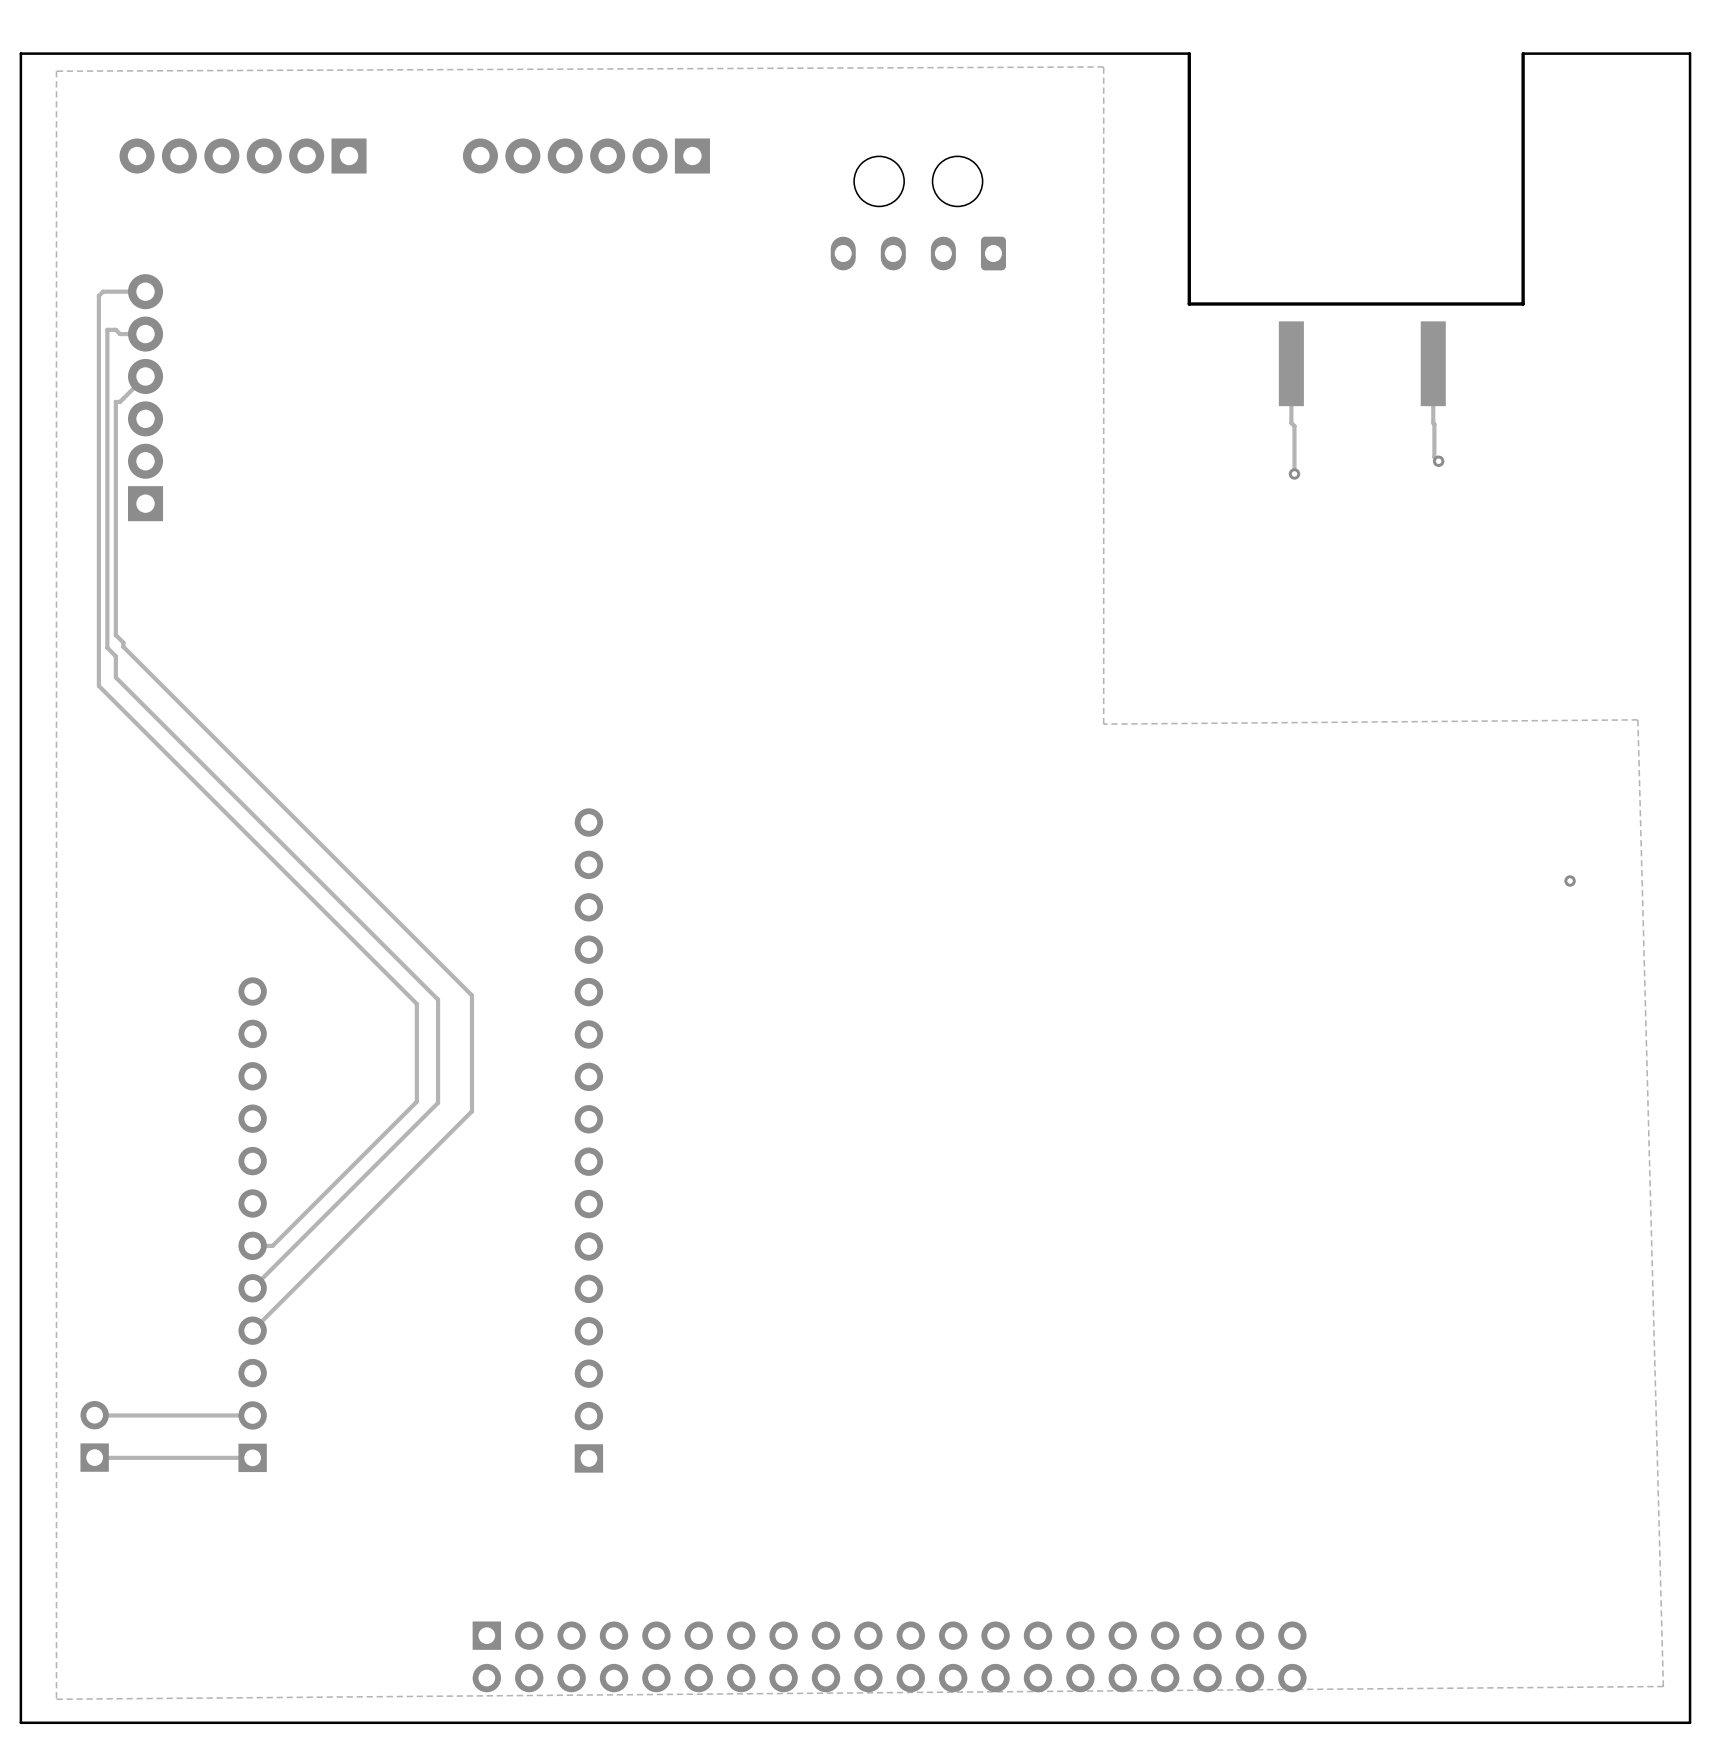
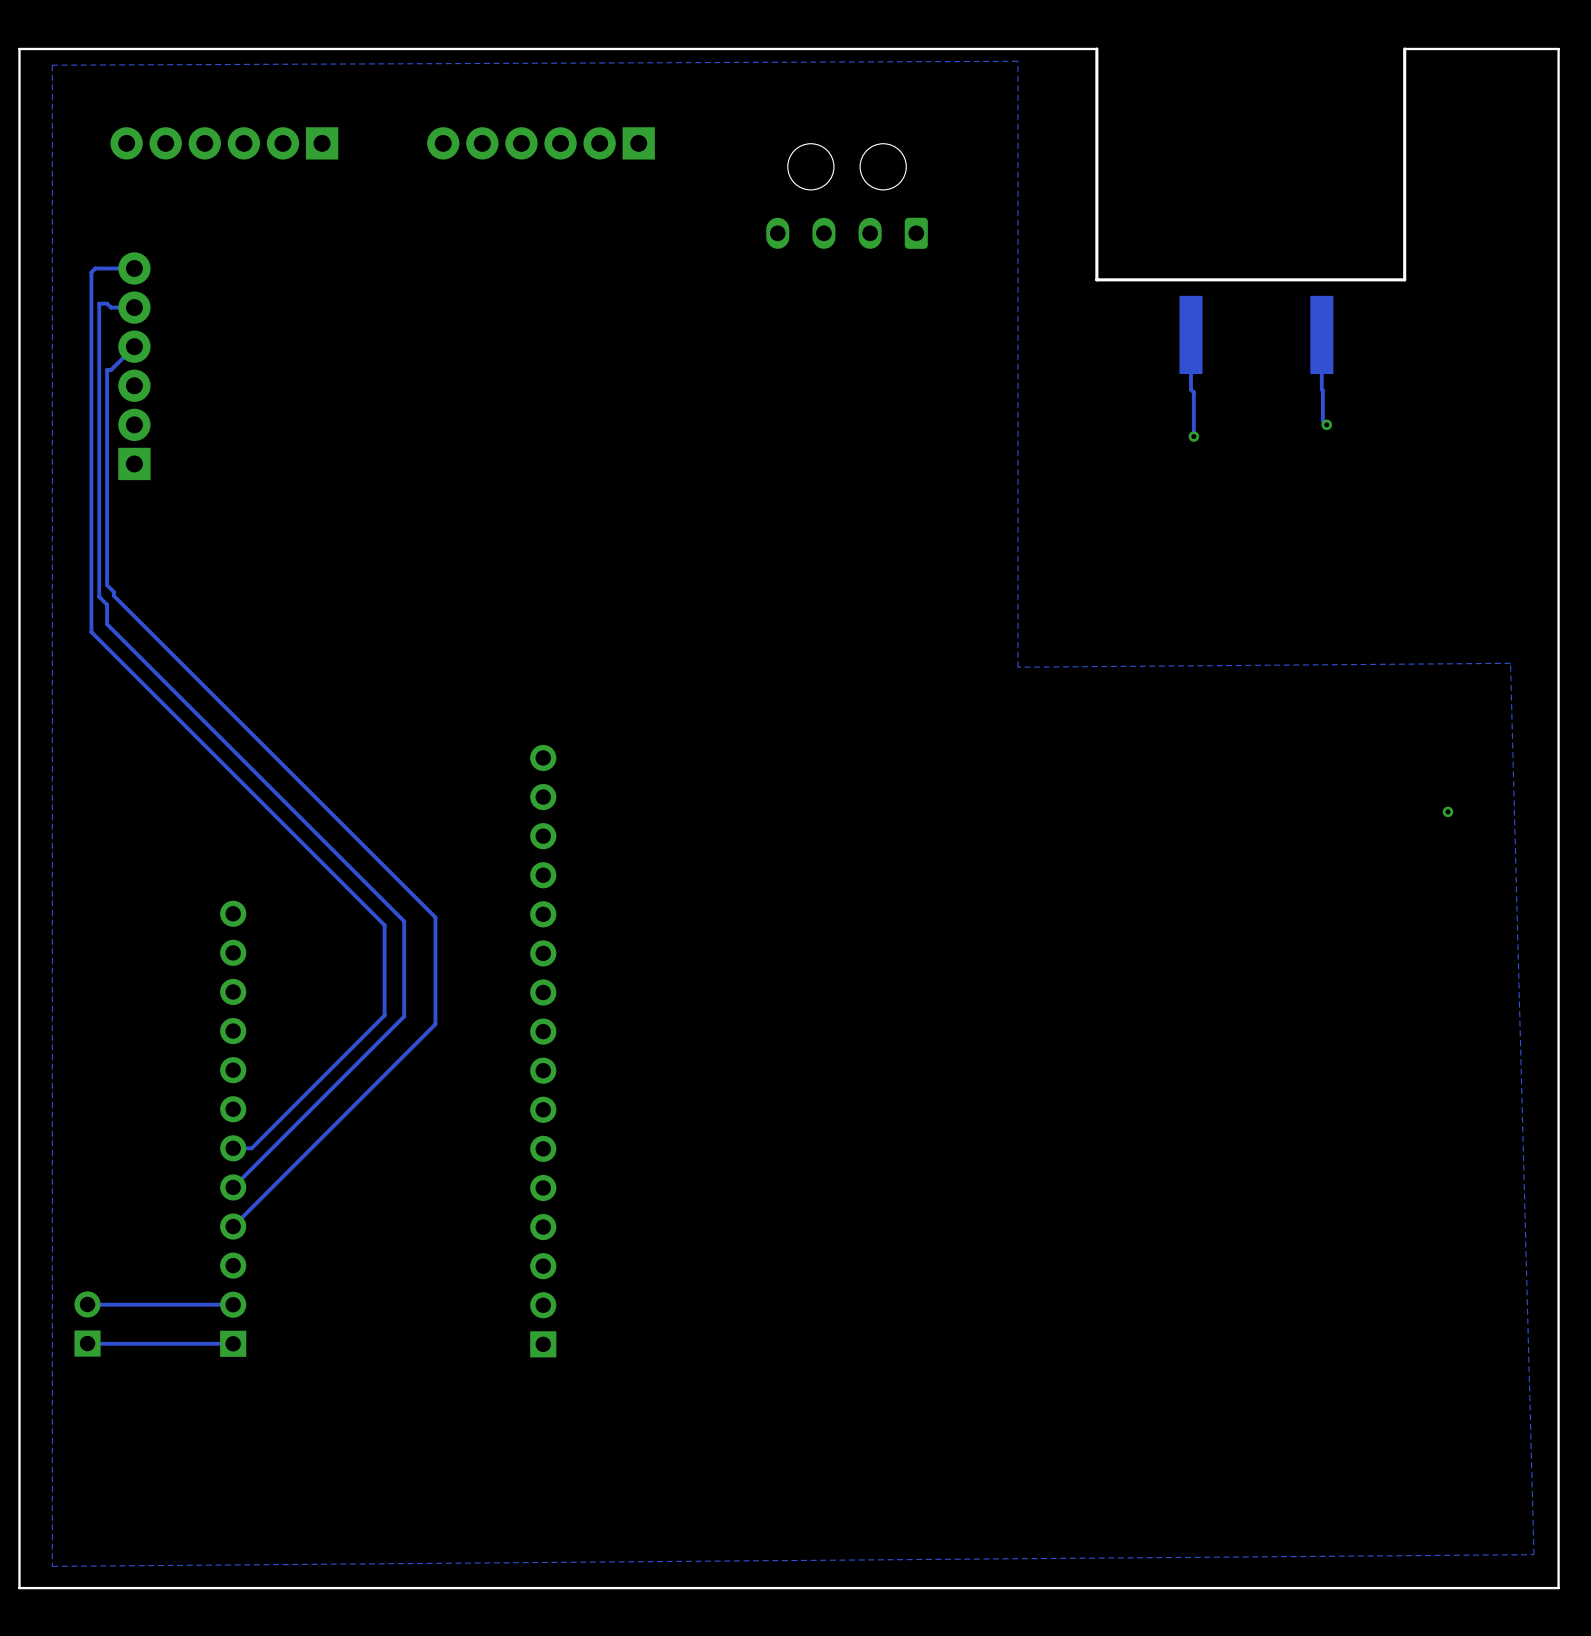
part: (889, 1656) -> none

